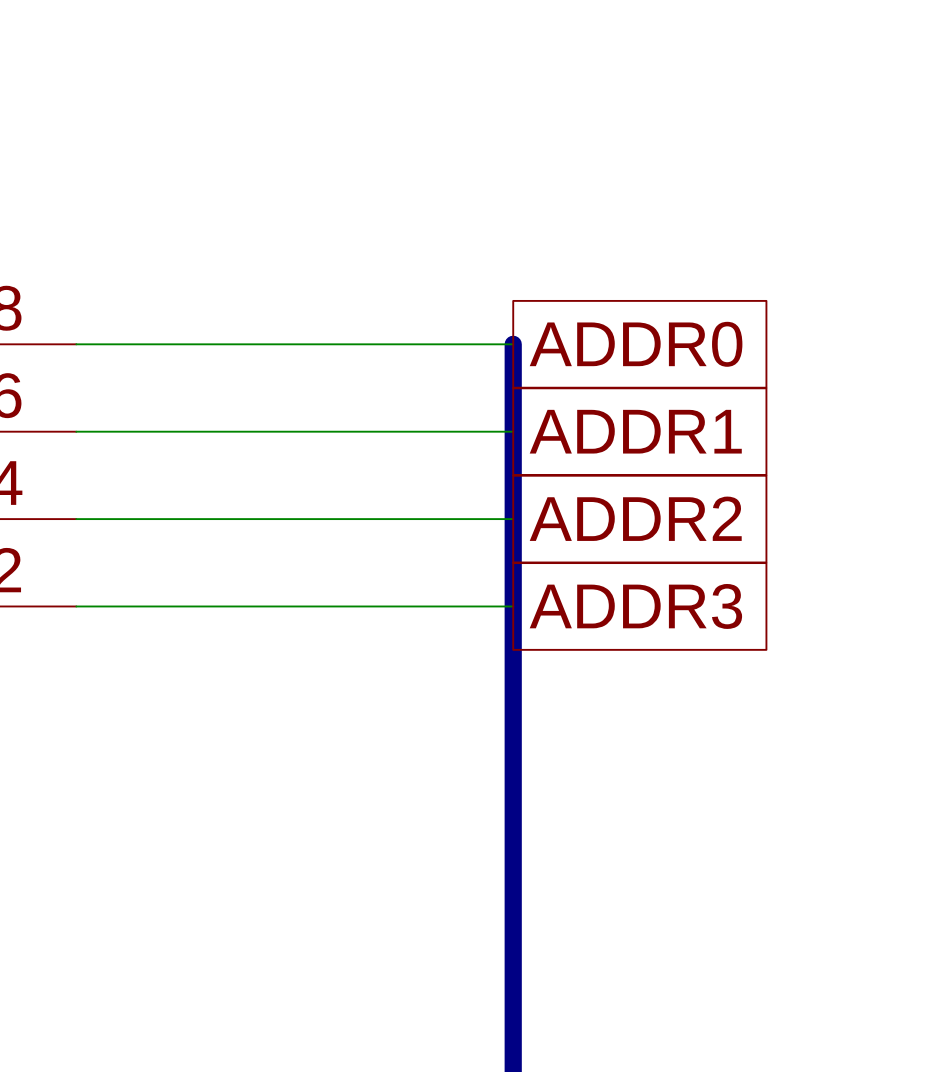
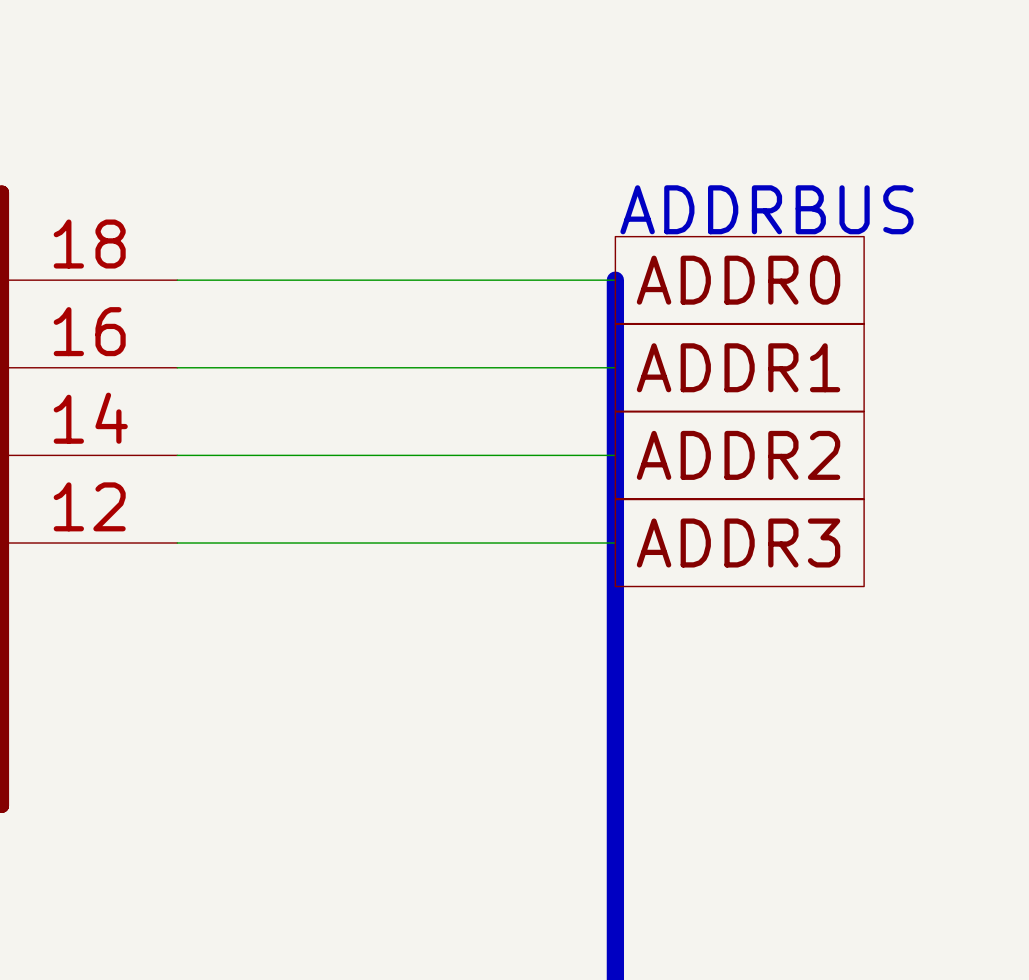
text: none -> ADDRBUS (766, 209)

